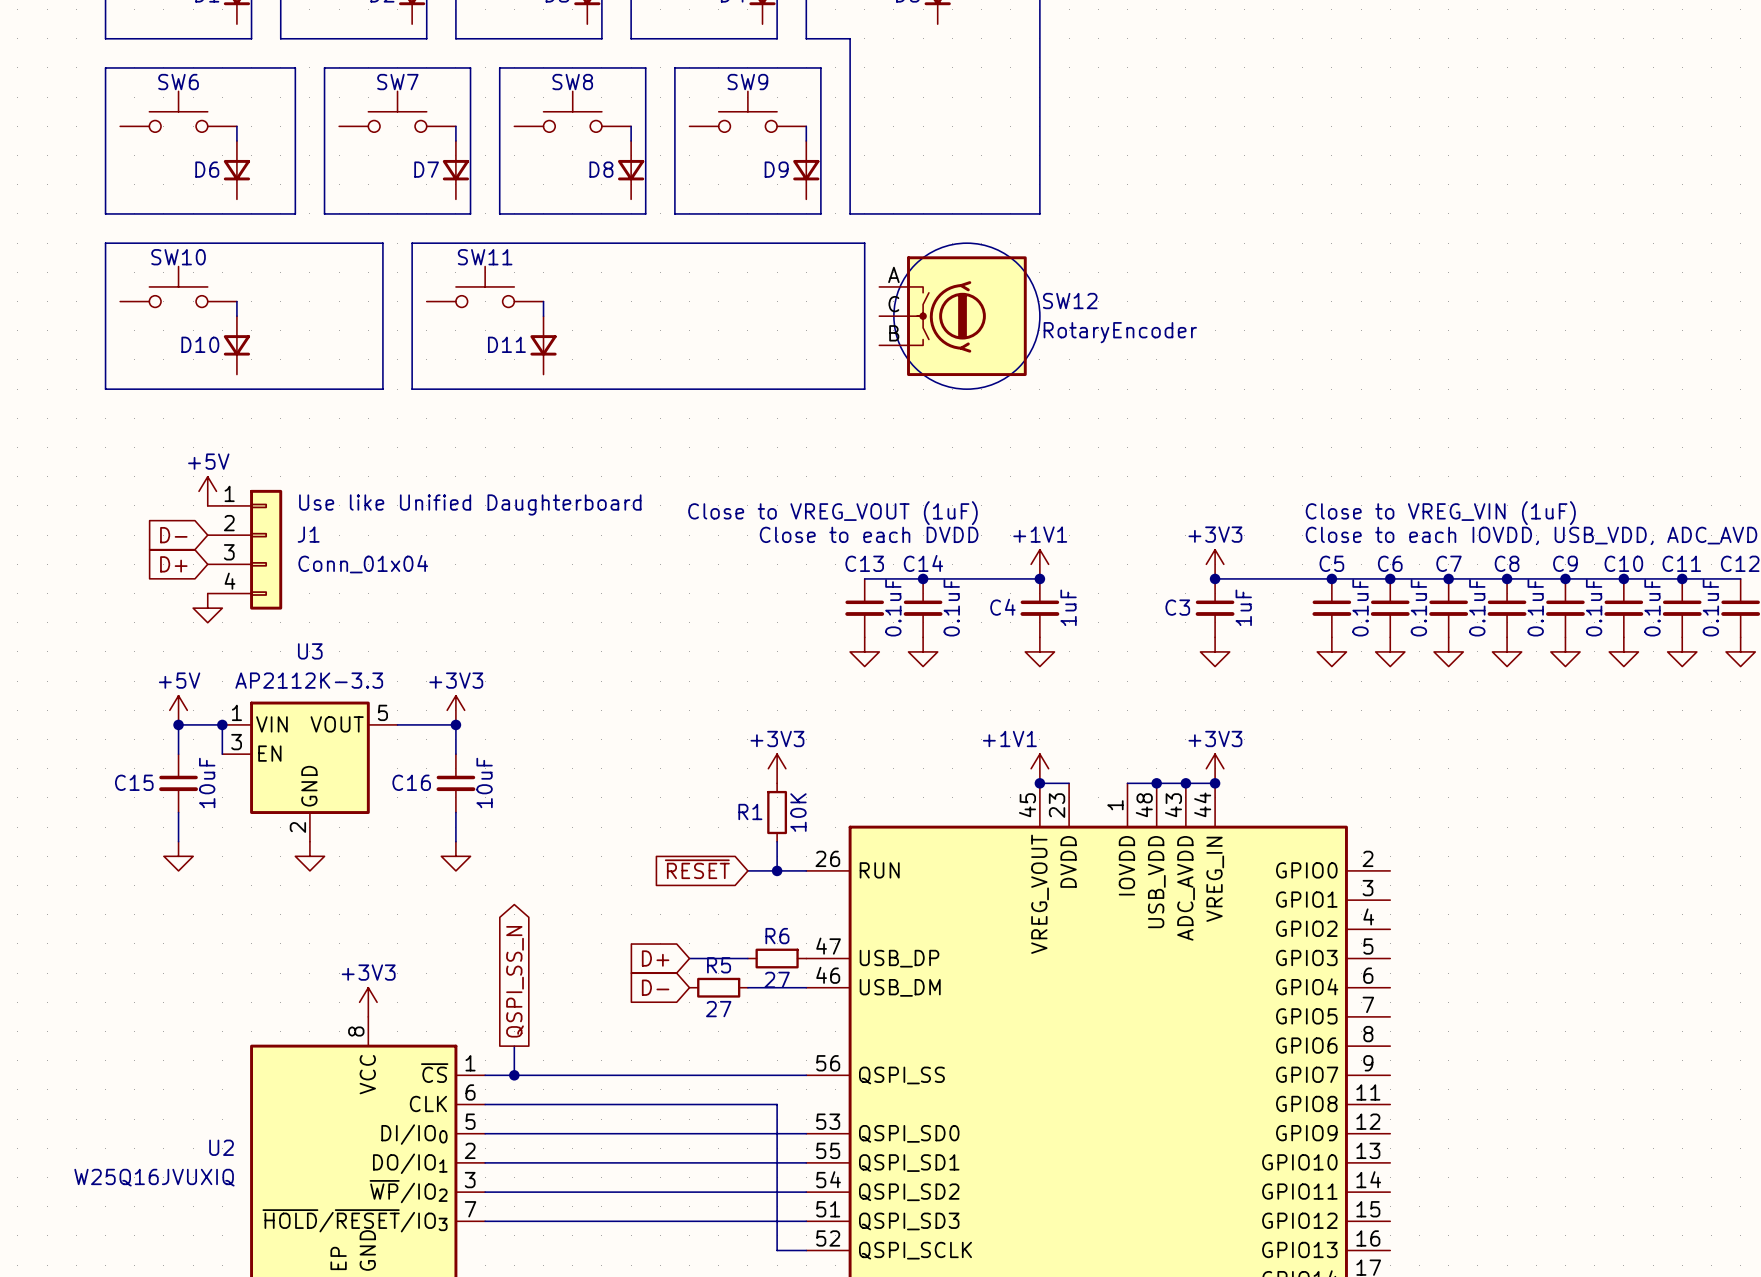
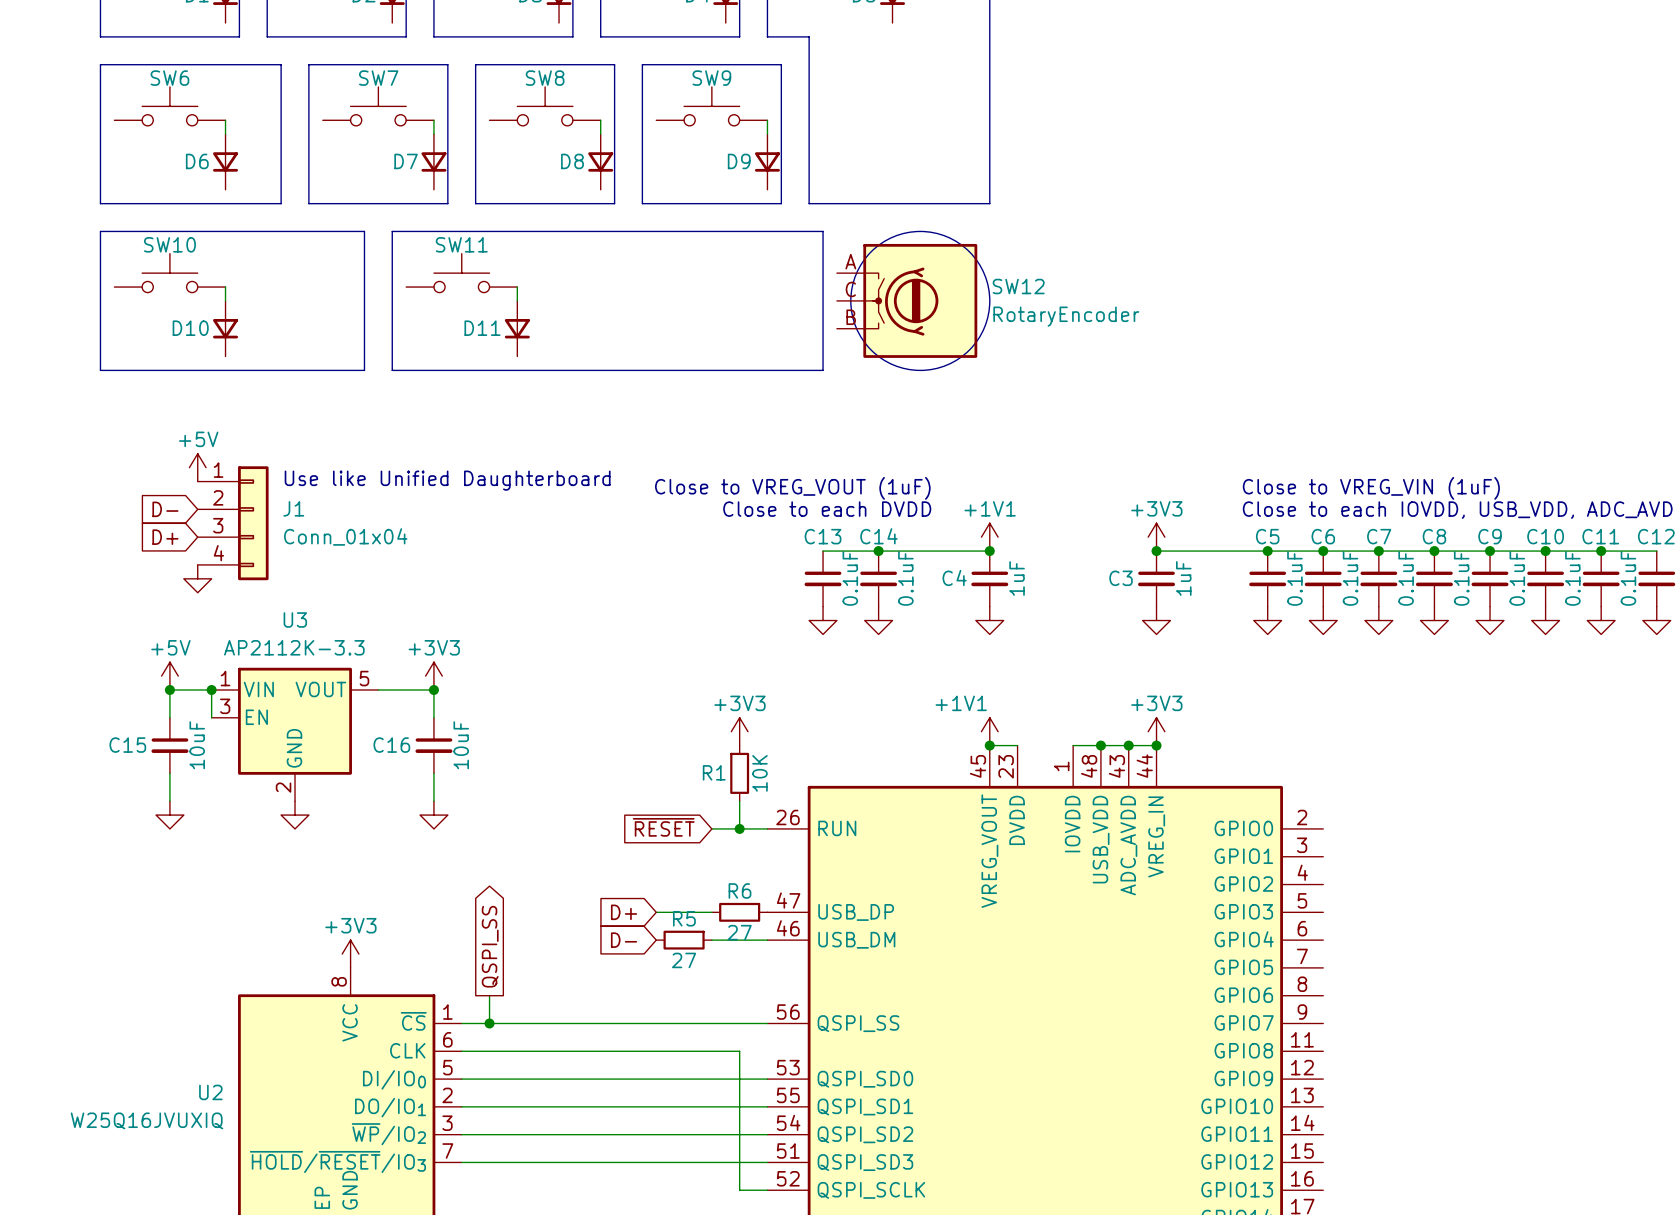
global label: QSPI_SS_N (515, 981) -> QSPI_SS (490, 946)

